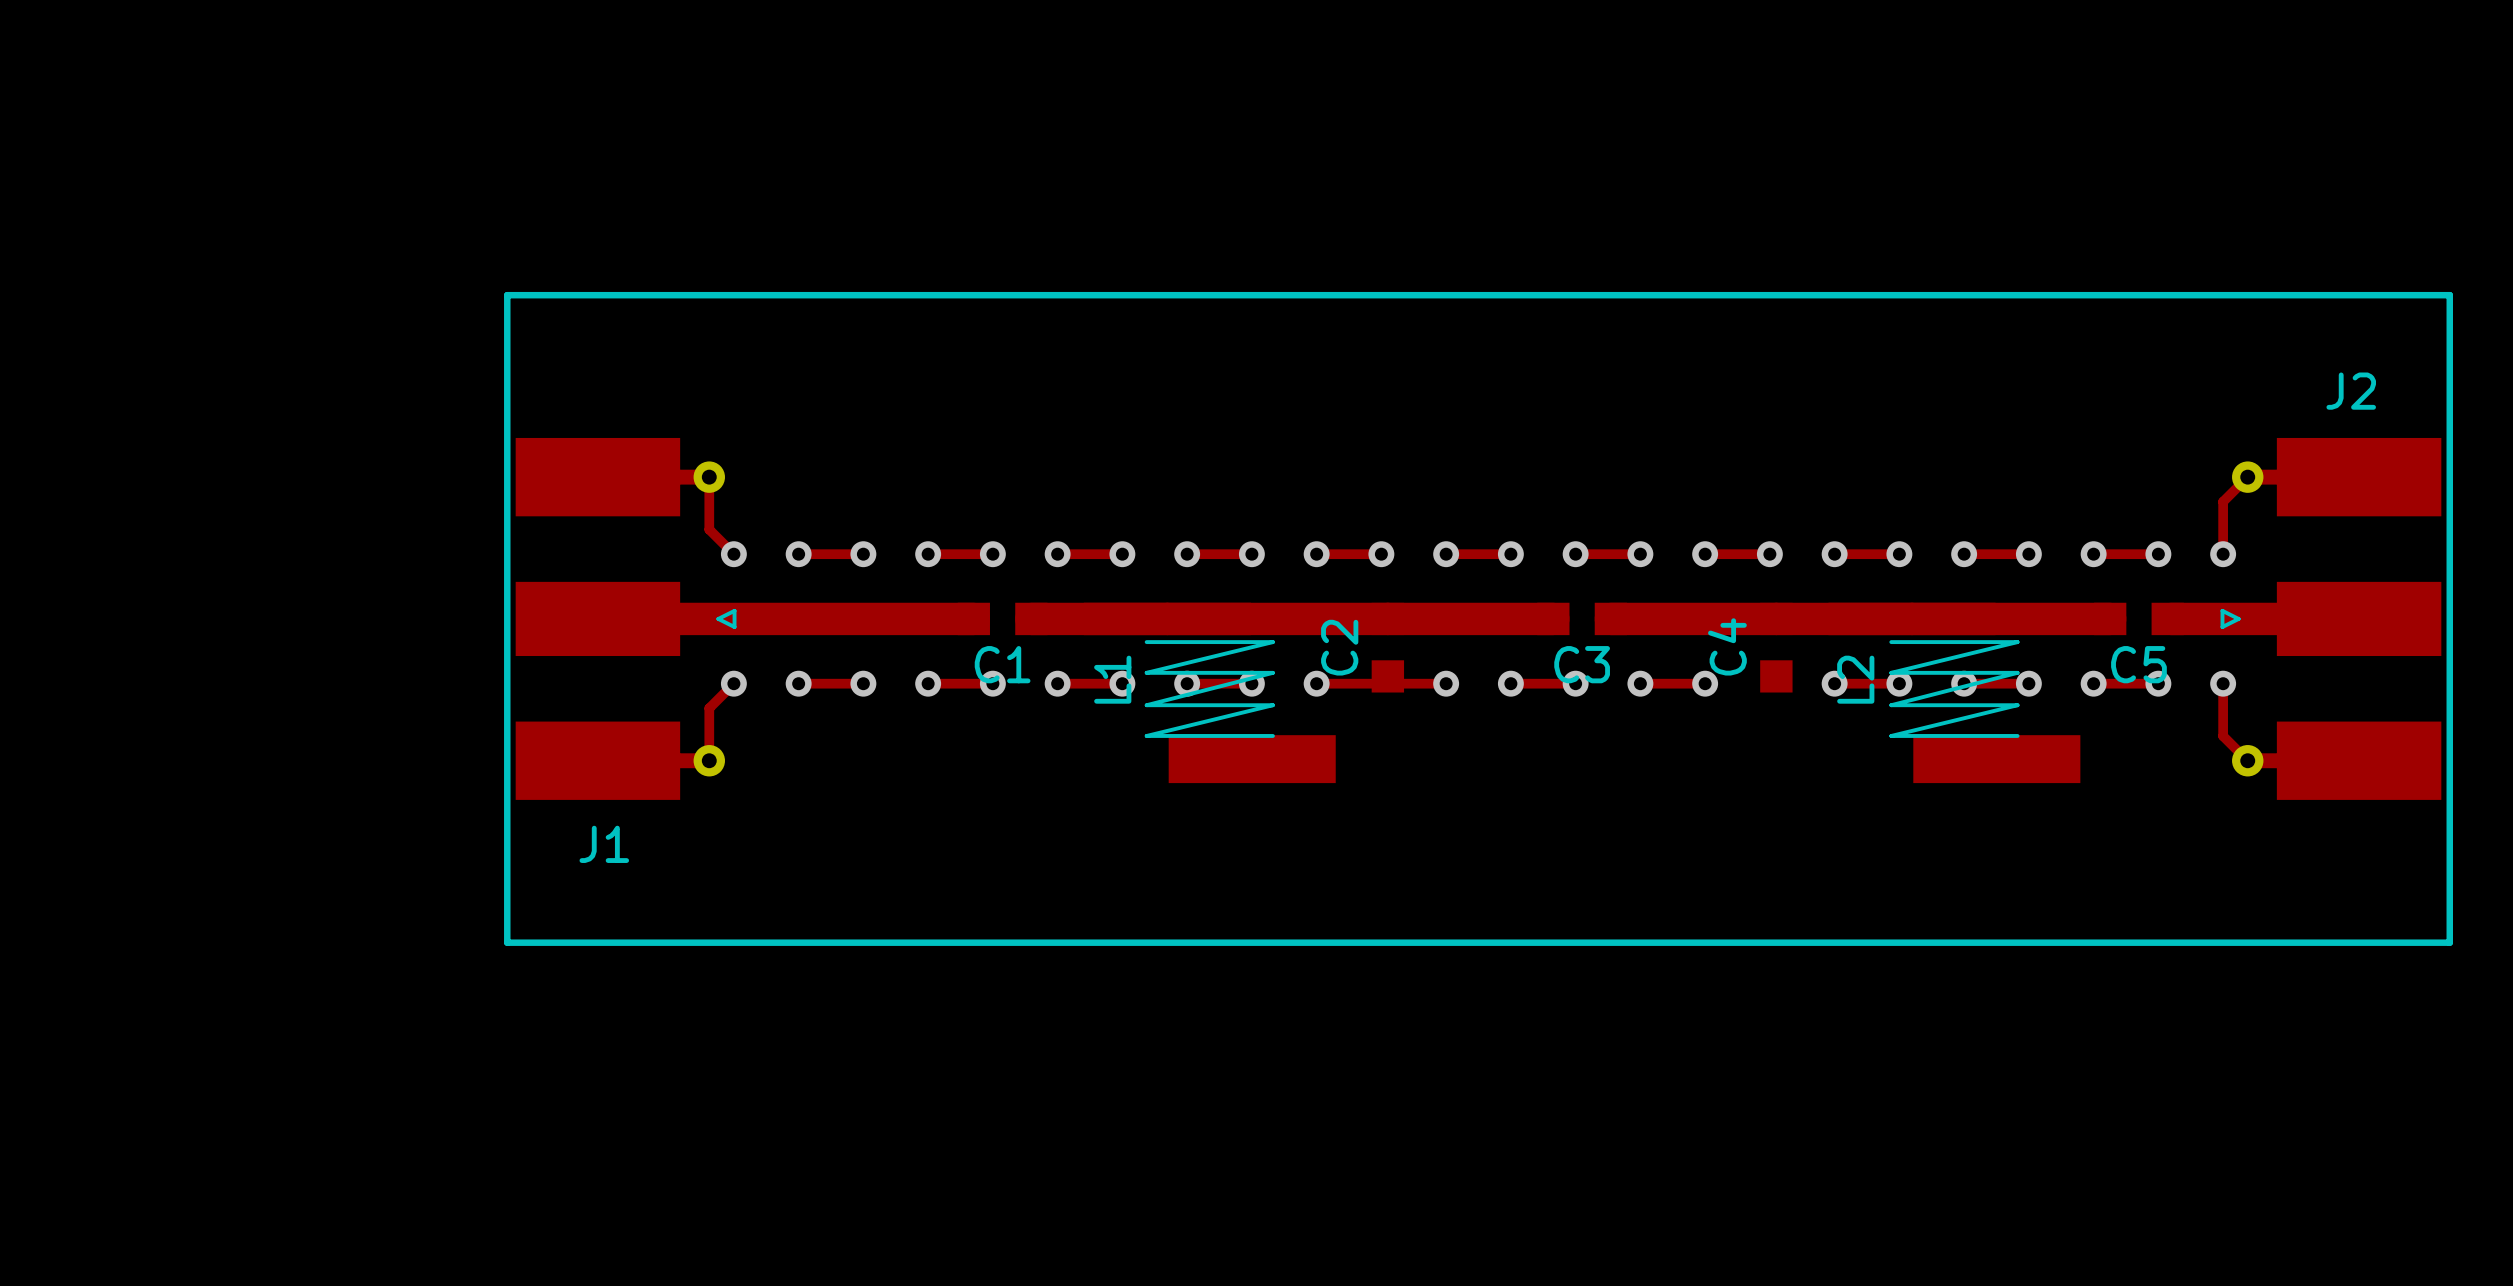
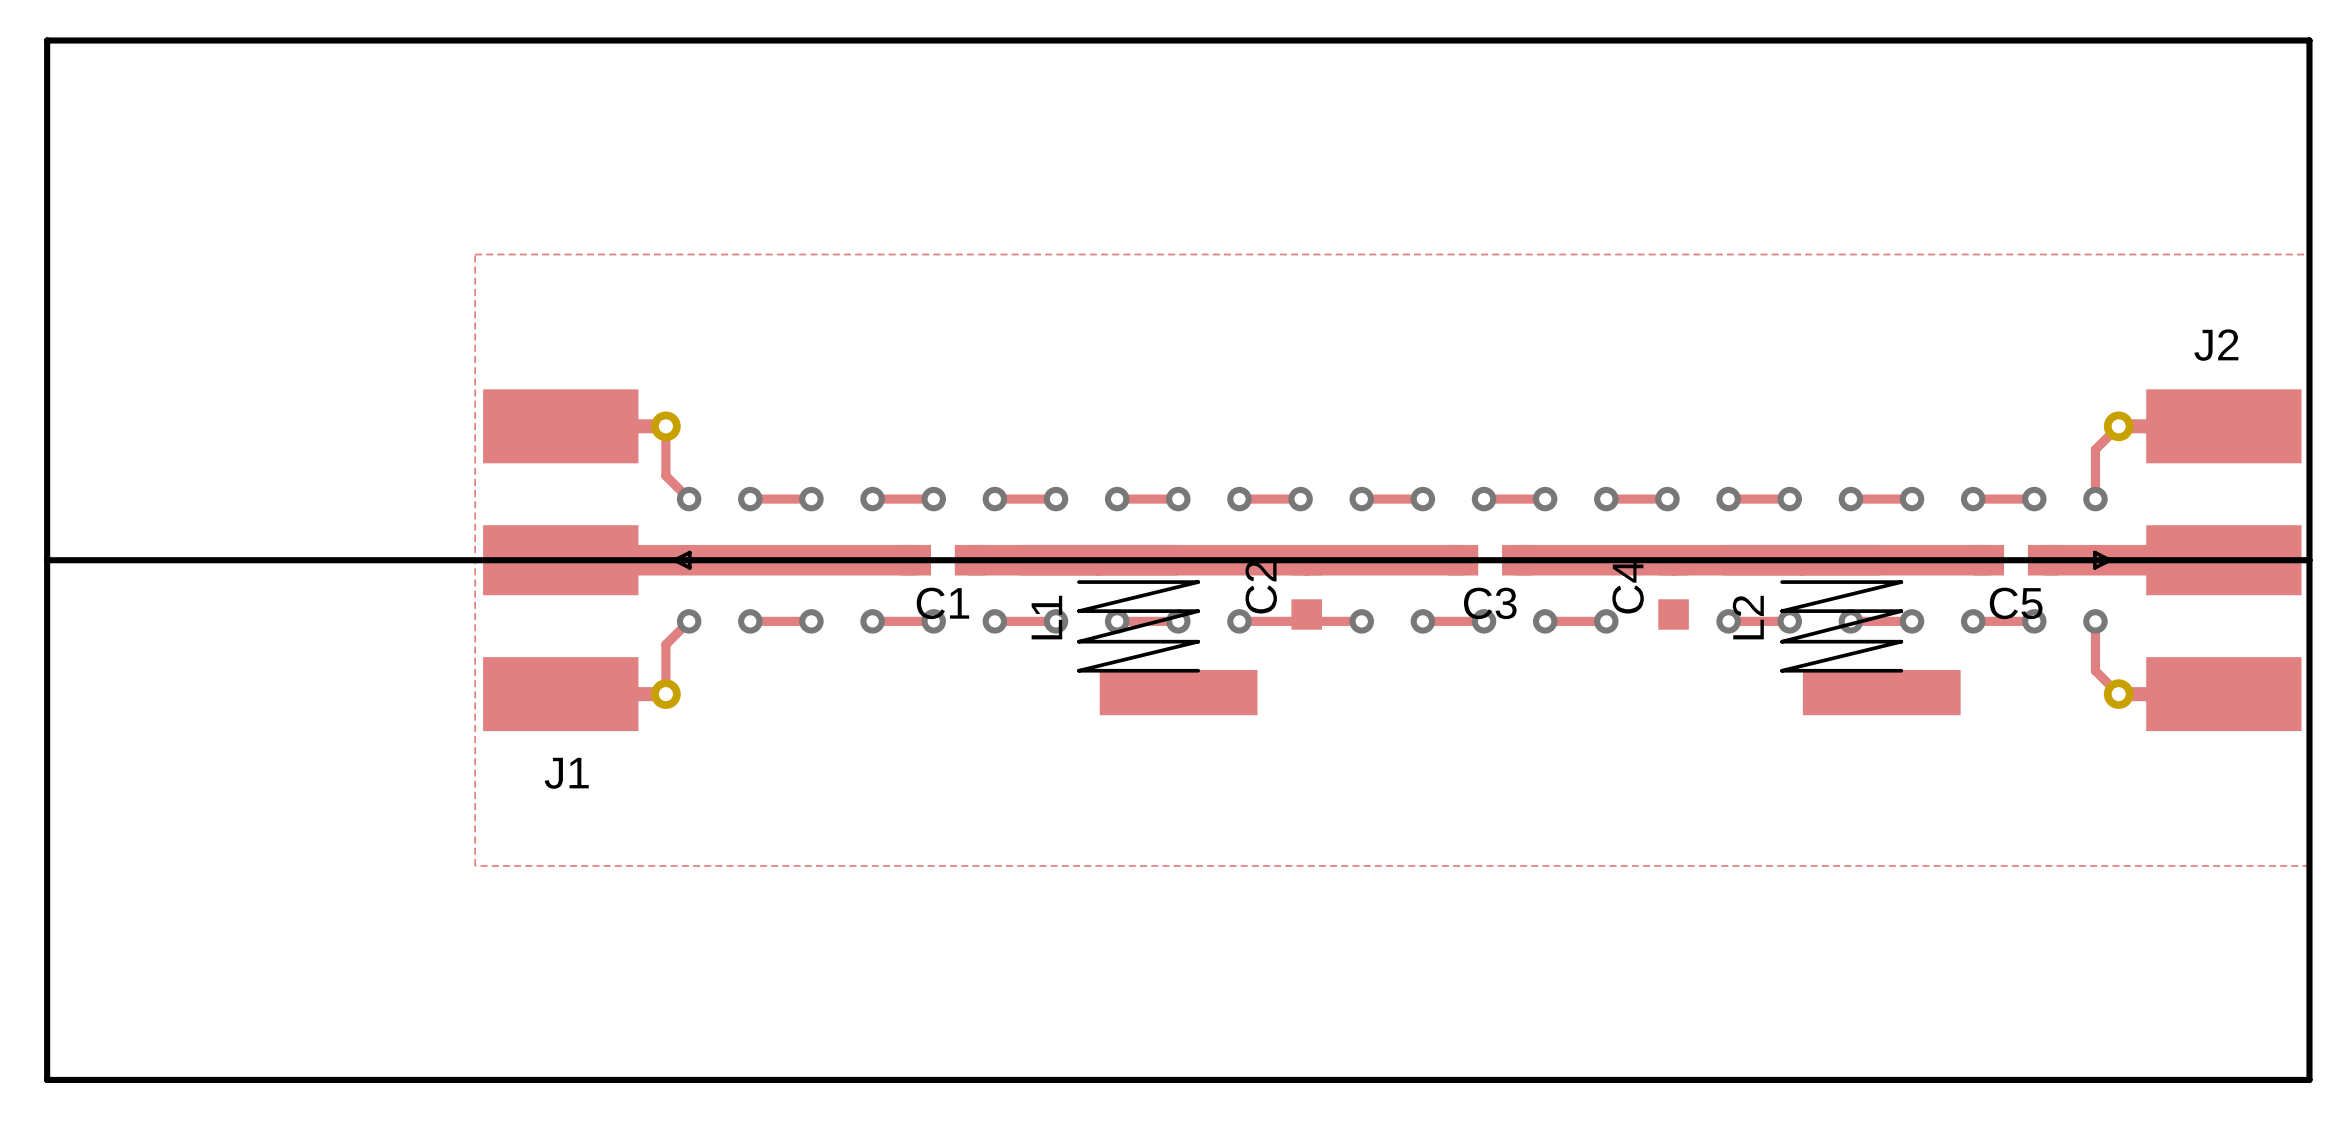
line: (2449, 295) (507, 295) (507, 942) (2449, 942) -> (2309, 254) (2309, 40) (47, 40) (47, 1079) (2309, 1079) (2309, 865)
line: none -> (47, 560) (2309, 560)

